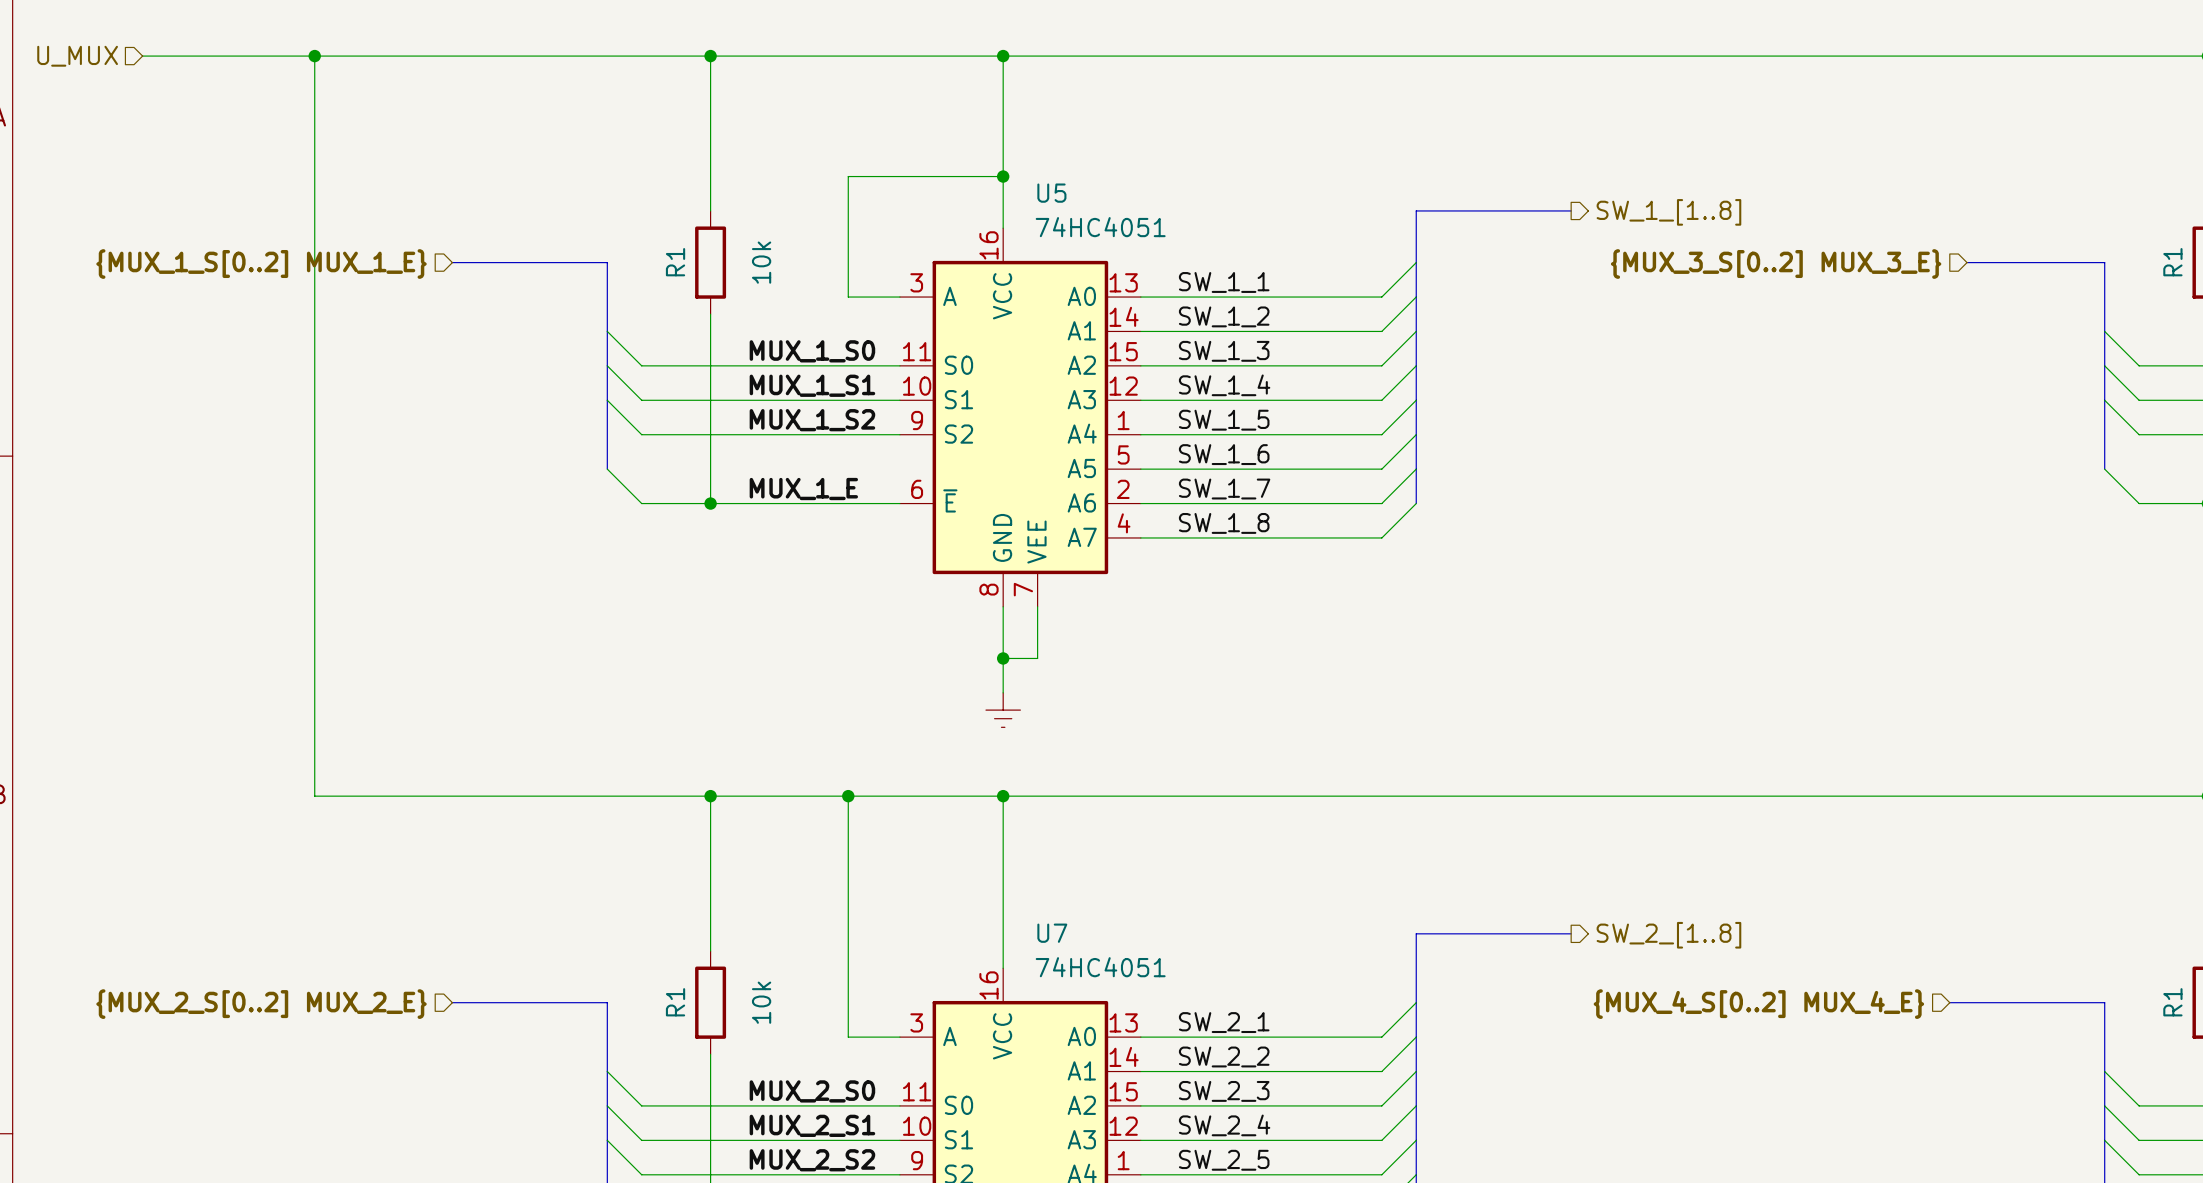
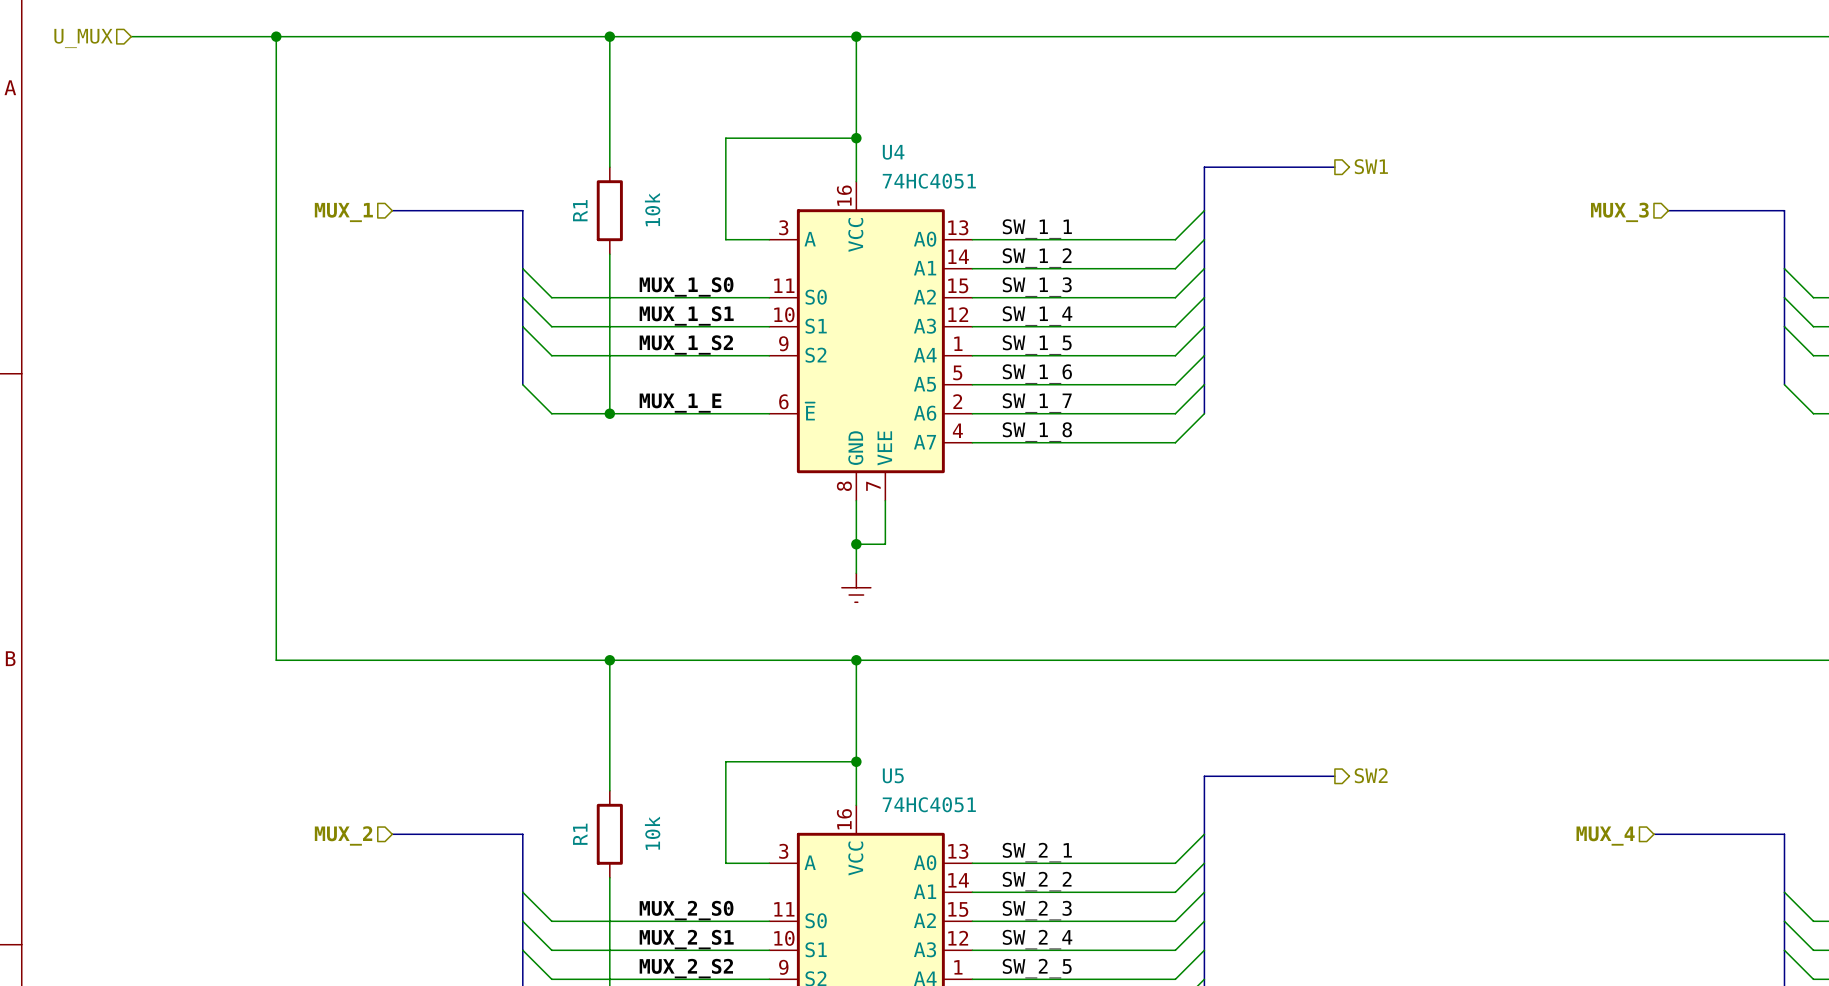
U5 name: U5 (1051, 193) -> U4 (893, 152)
hierarchical label: SW_1_[1..8] (1668, 212) -> SW1 (1371, 166)
hierarchical label: {MUX_1_S[0..2] MUX_1_E} (261, 264) -> MUX_1 (343, 212)
hierarchical label: {MUX_3_S[0..2] MUX_3_E} (1776, 264) -> MUX_3 (1619, 212)
wire: (848, 796) (848, 916) -> (856, 761) (725, 761)
junction: (848, 796) -> none
junction: none -> (856, 761)
U7 name: U7 (1052, 933) -> U5 (893, 775)
hierarchical label: SW_2_[1..8] (1668, 935) -> SW2 (1371, 775)
hierarchical label: {MUX_2_S[0..2] MUX_2_E} (261, 1004) -> MUX_2 (343, 835)
hierarchical label: {MUX_4_S[0..2] MUX_4_E} (1758, 1004) -> MUX_4 (1605, 836)

